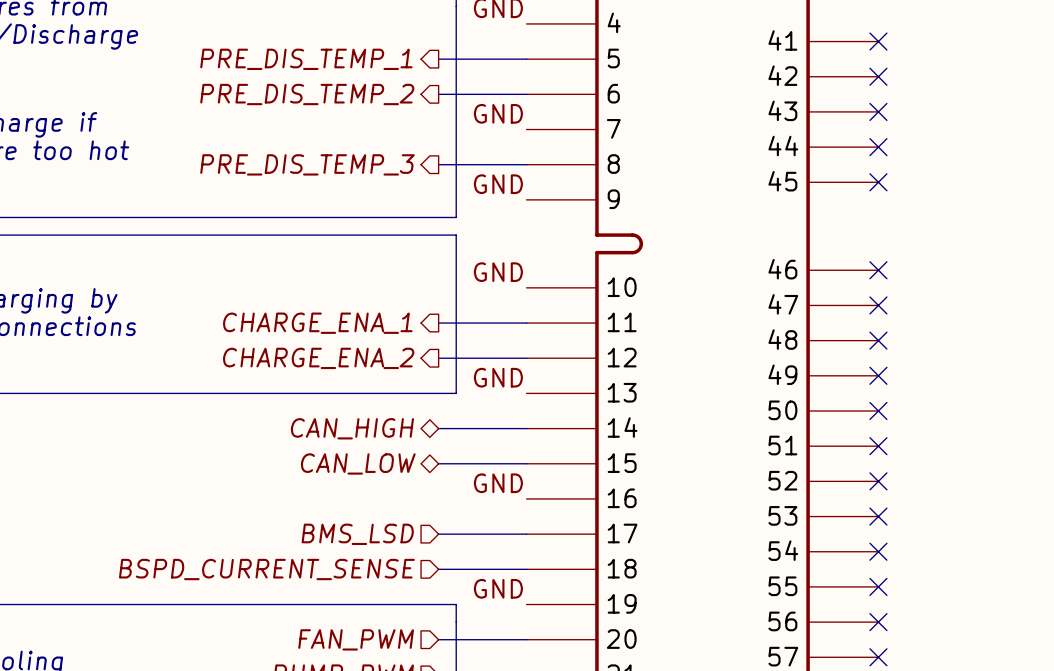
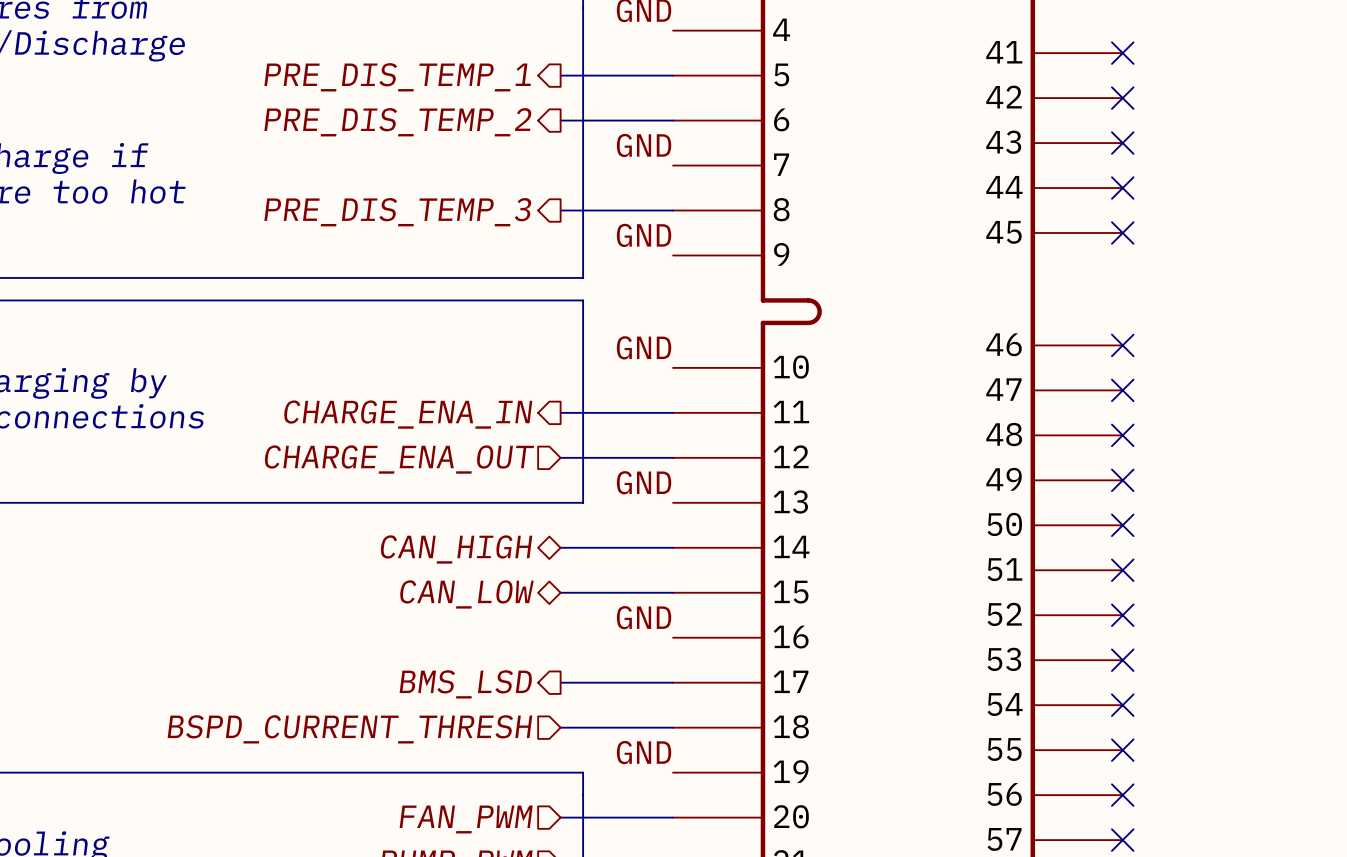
hierarchical label: CHARGE_ENA_1 (317, 323) -> CHARGE_ENA_IN (408, 414)
hierarchical label shape: output (318, 358) -> input (399, 459)
hierarchical label: CHARGE_ENA_2 (318, 358) -> CHARGE_ENA_OUT (399, 459)
hierarchical label shape: input (357, 534) -> output (465, 684)
hierarchical label: BSPD_CURRENT_SENSE (266, 569) -> BSPD_CURRENT_THRESH (349, 729)

